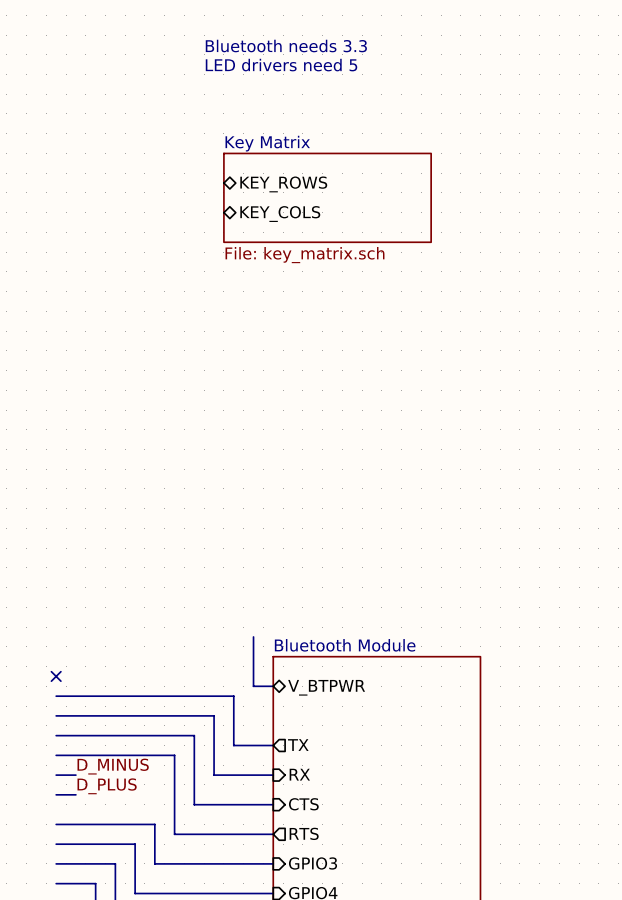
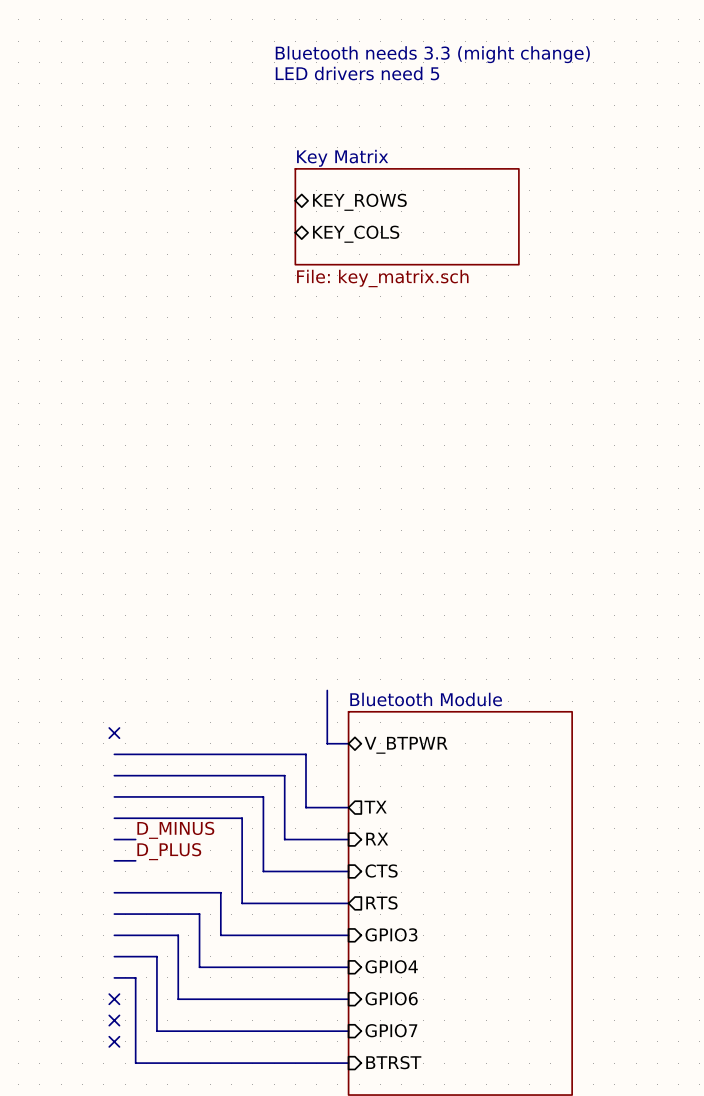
text: Bluetooth needs 3.3 (286, 46) -> Bluetooth needs 3.3 (might change) (432, 54)

